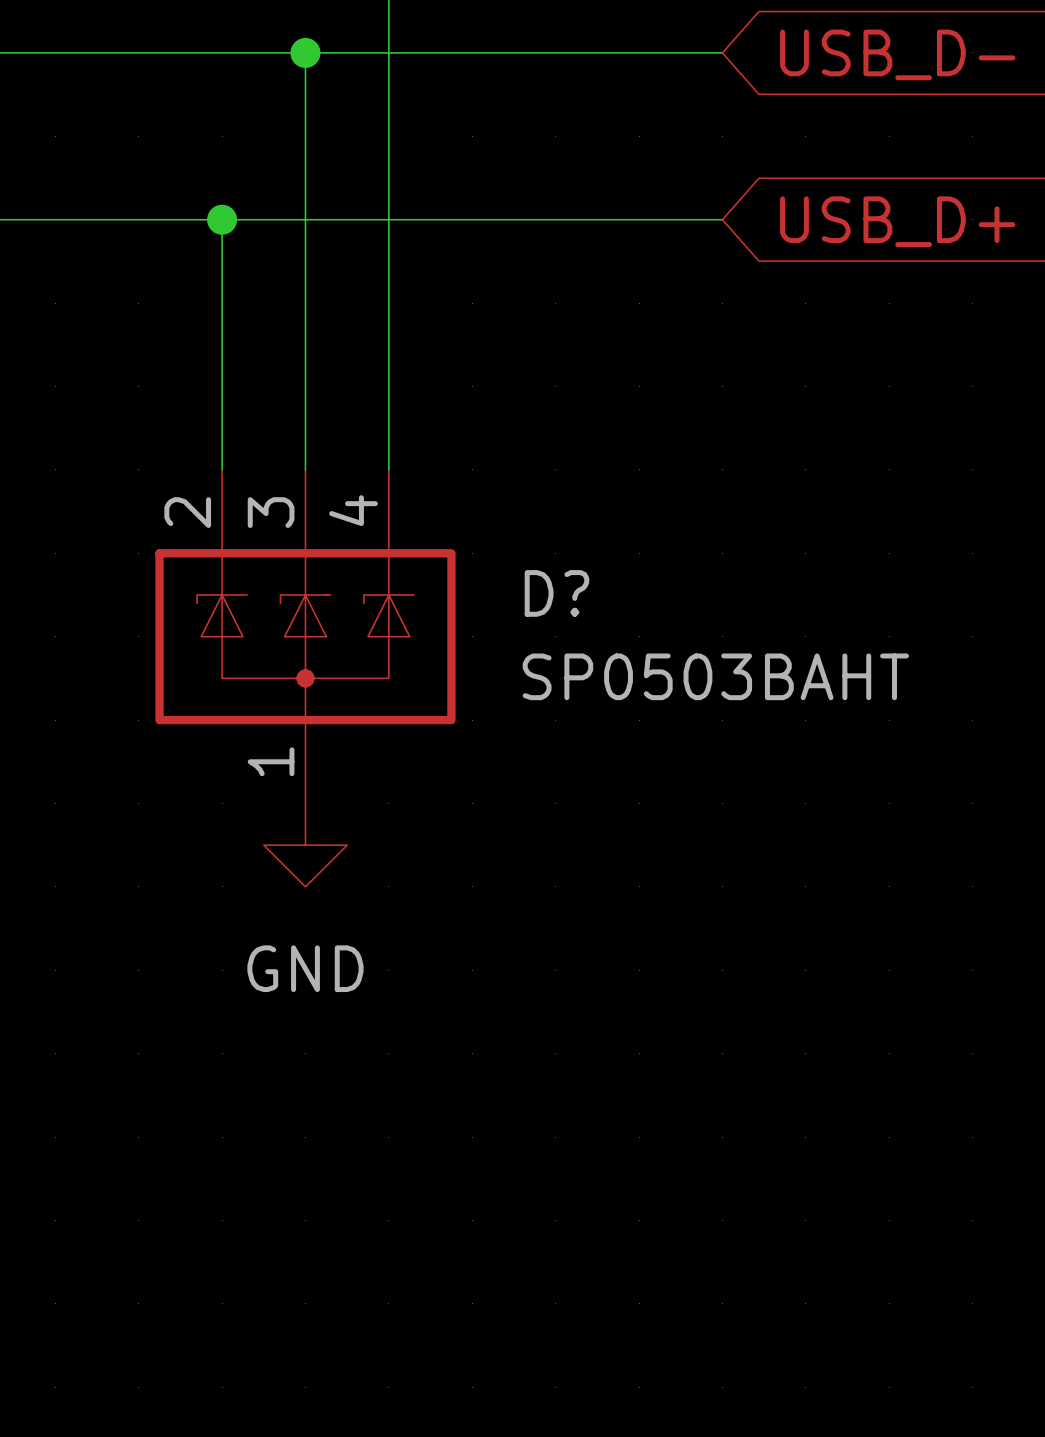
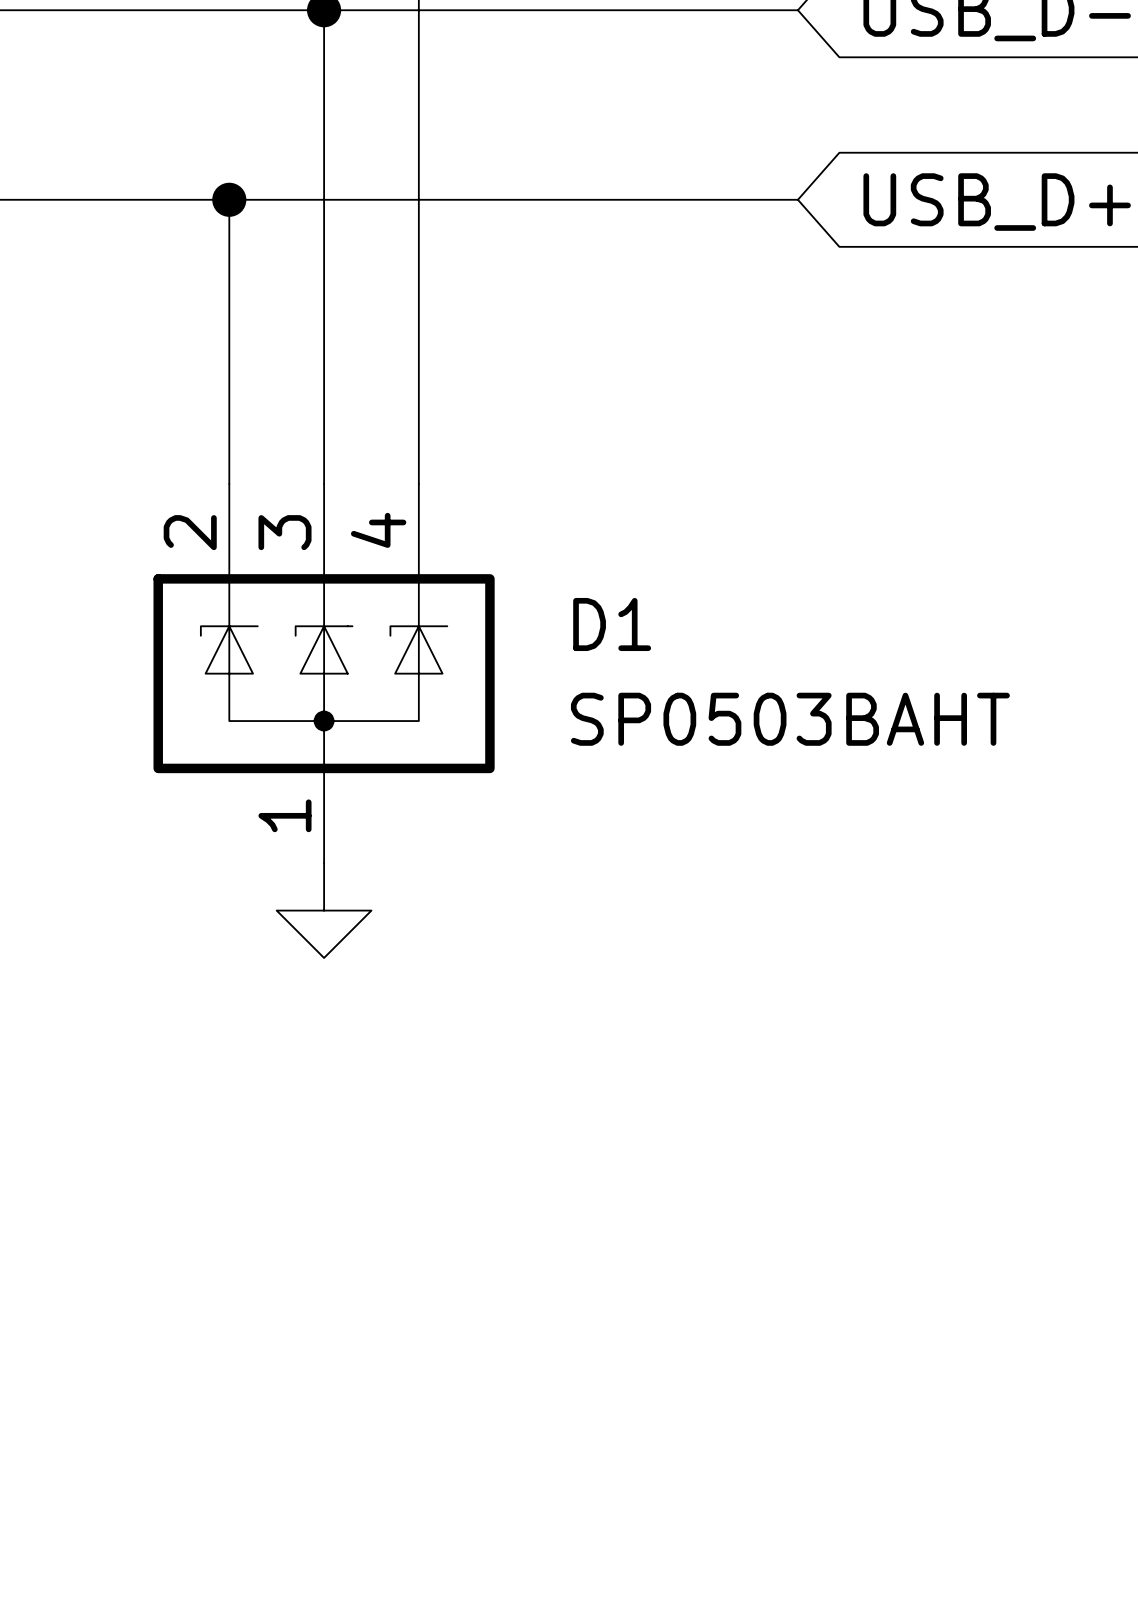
D? name: D? (556, 593) -> D1 (612, 624)
power symbol text: GND (305, 968) -> none

